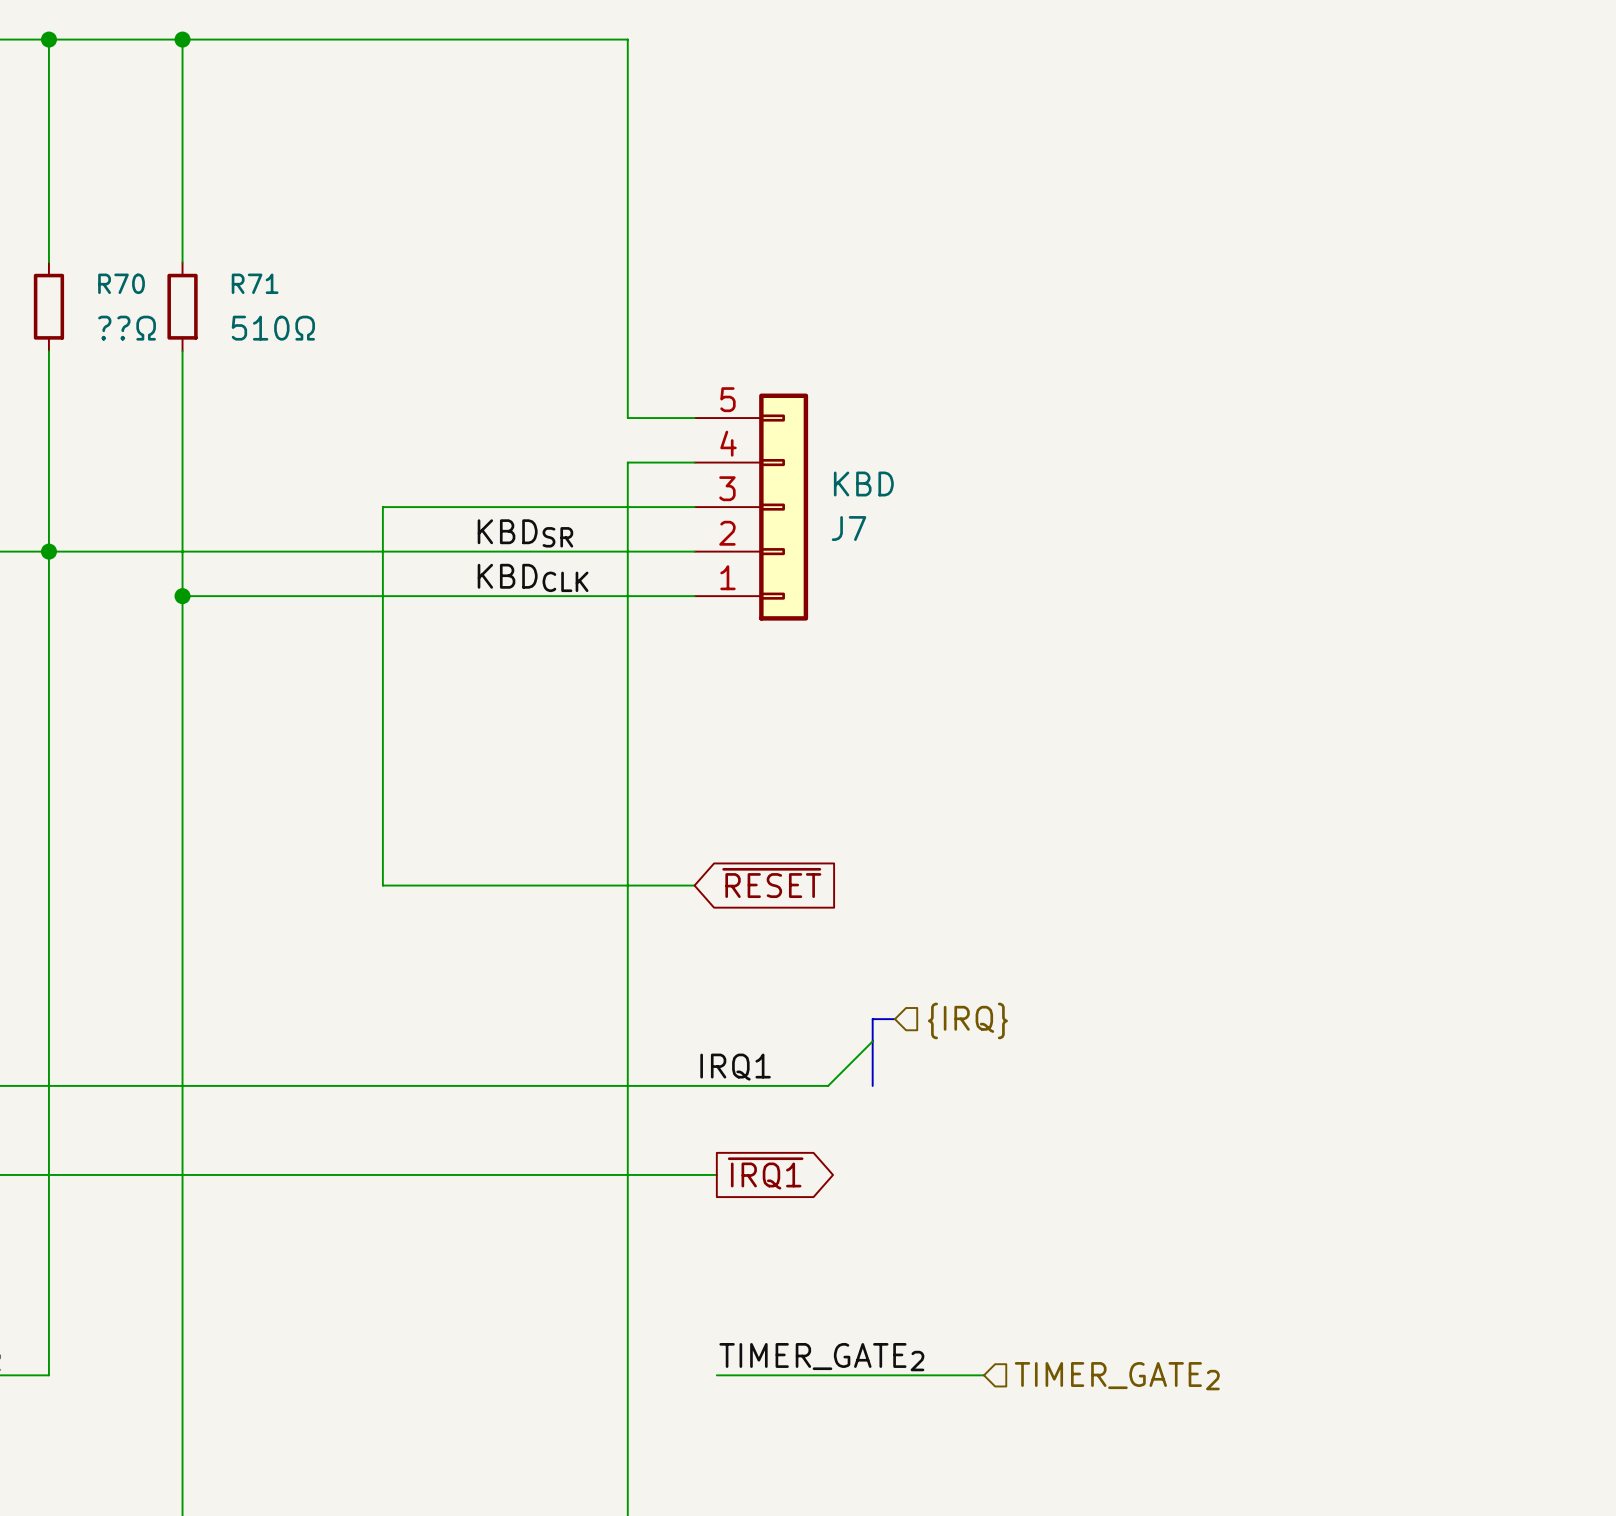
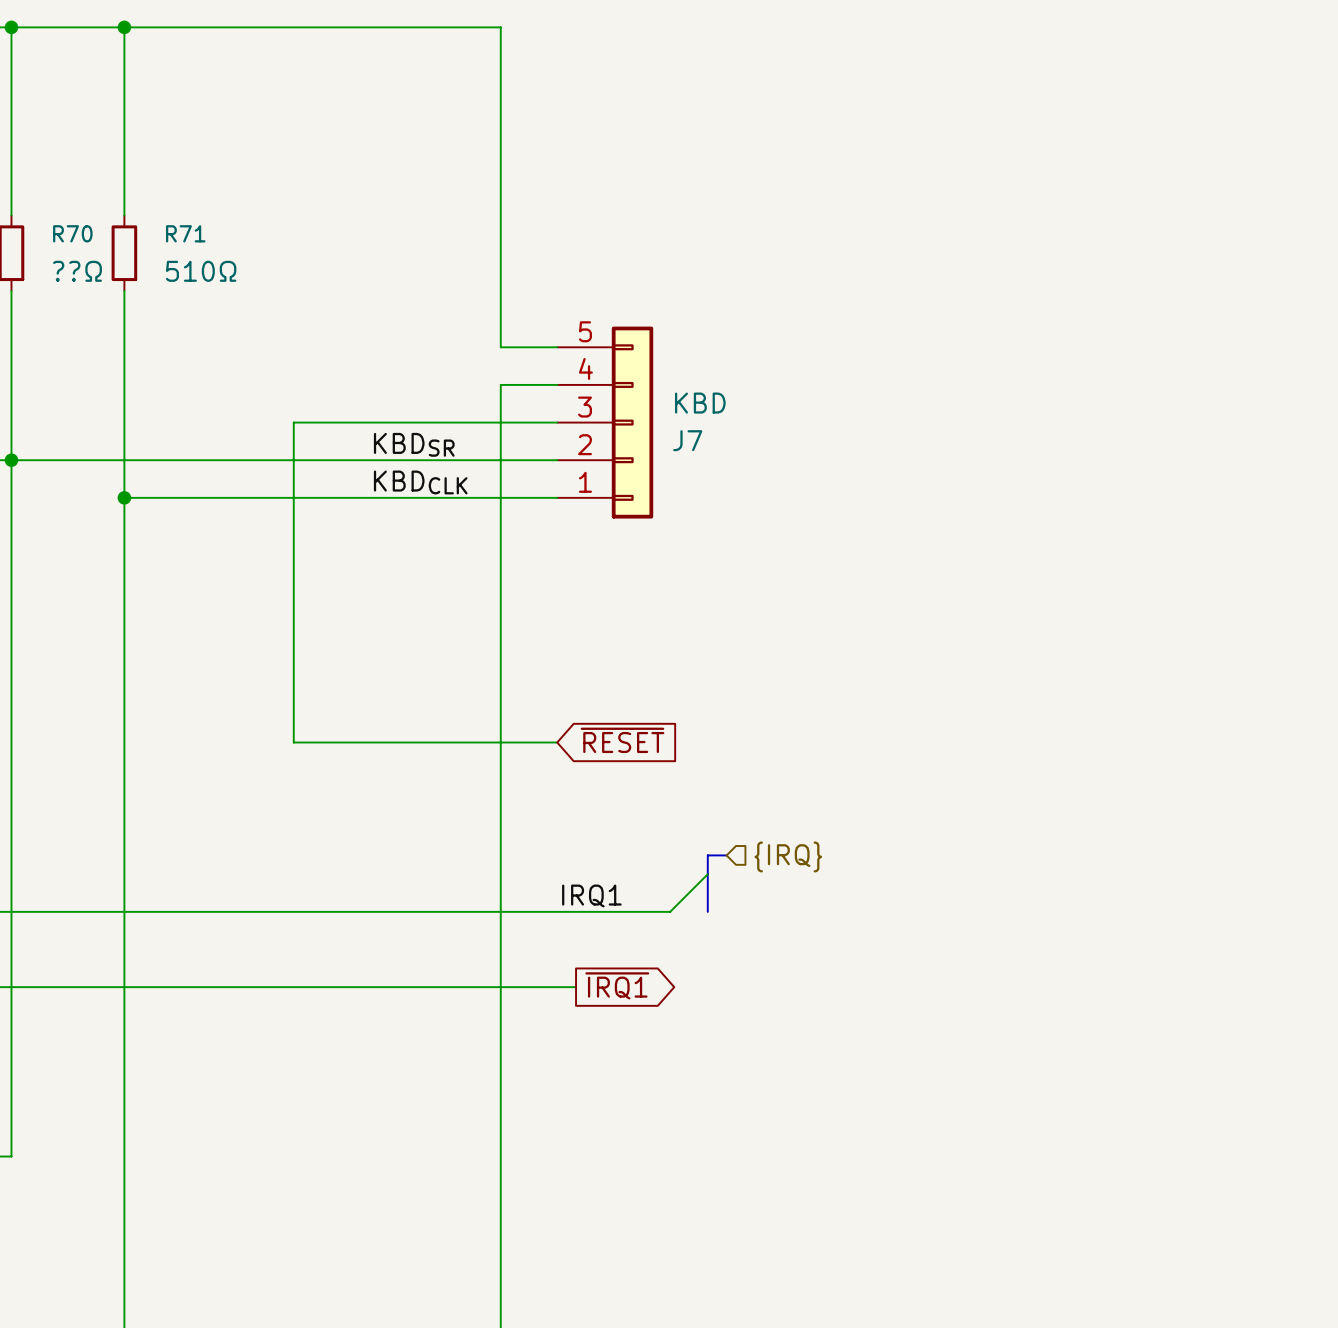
label: TIMER_GATE2 (821, 1357) -> none
wire: (716, 1375) (984, 1375) -> none
hierarchical label: TIMER_GATE2 (1117, 1376) -> none

